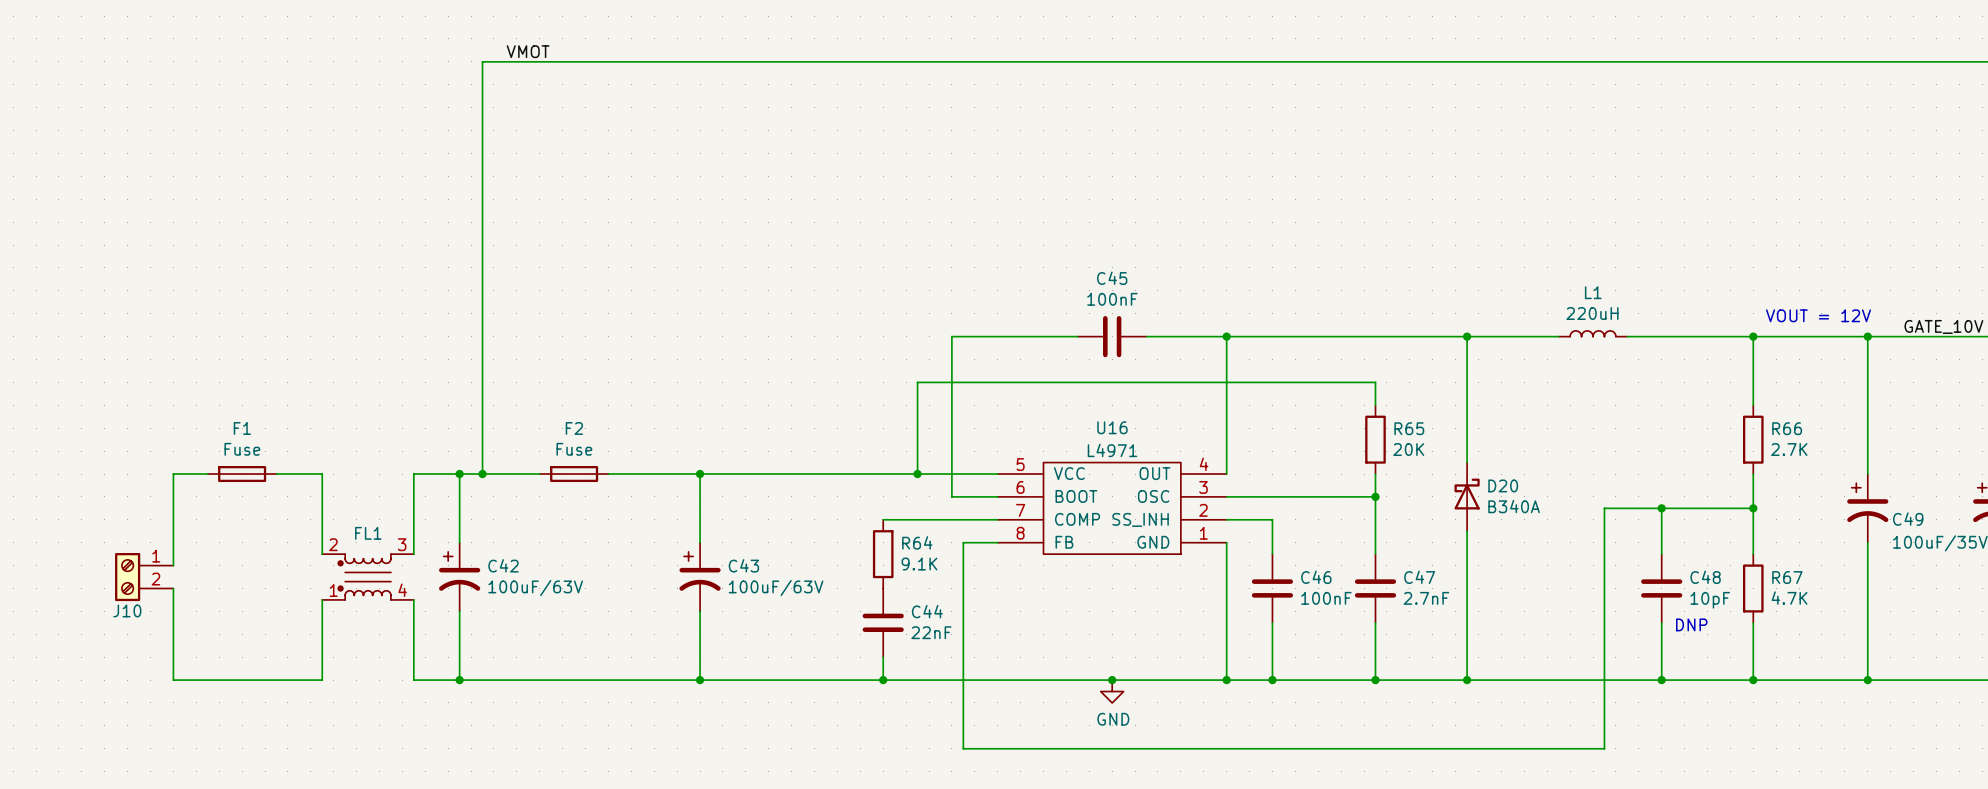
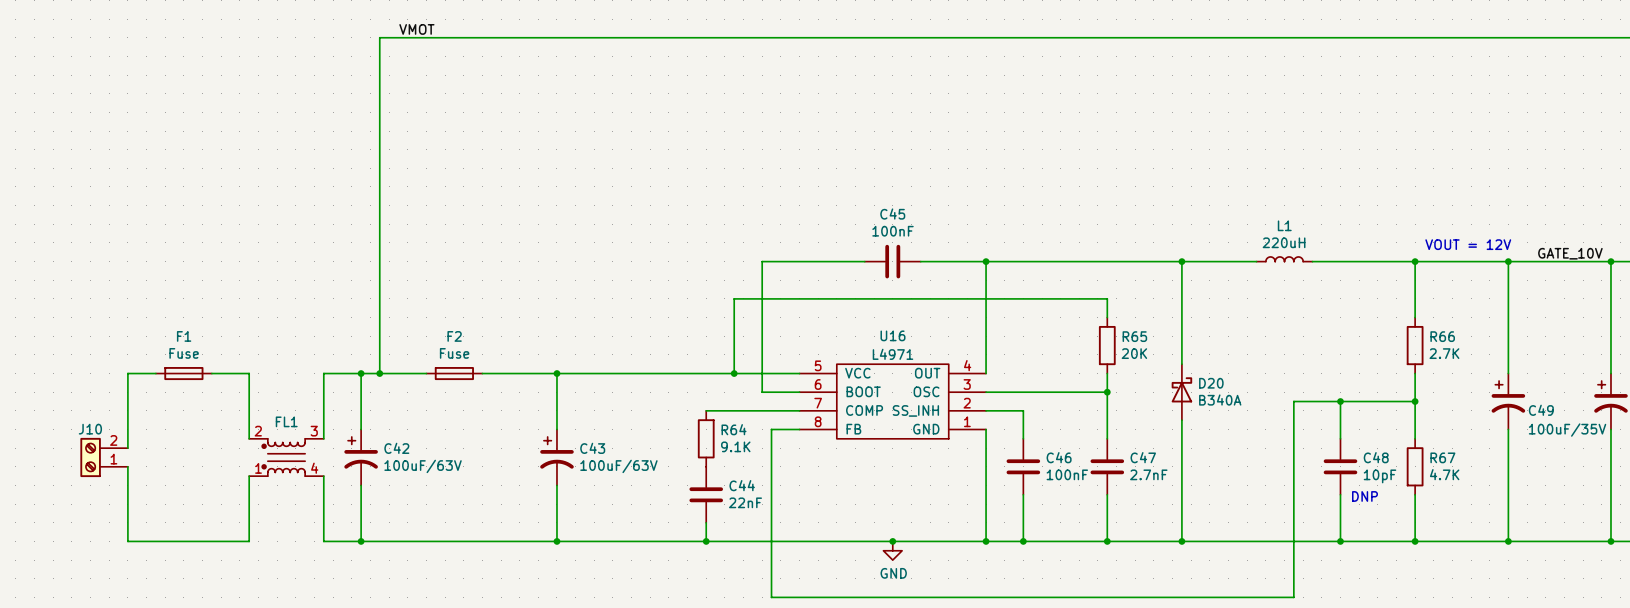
J10 flip: as is (127, 577) -> up-down (90, 457)

